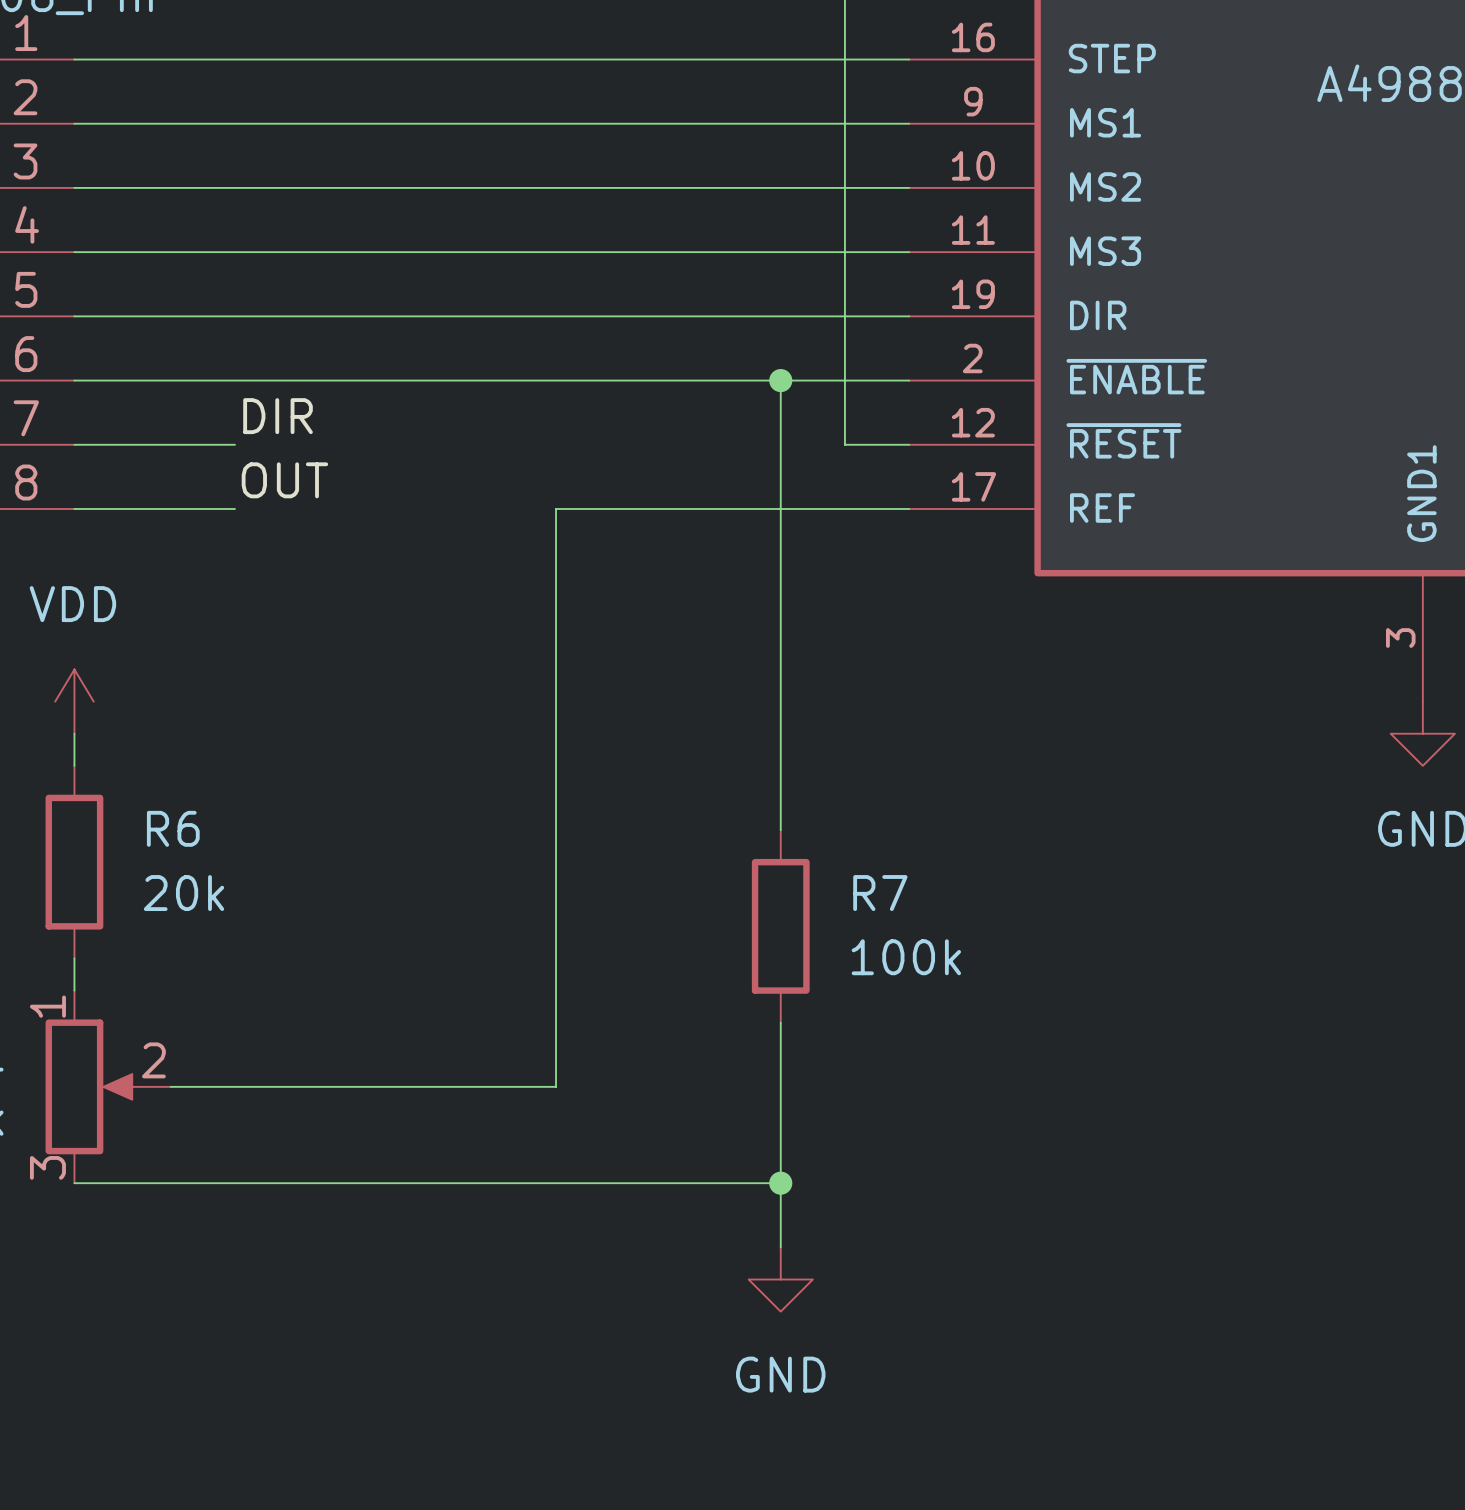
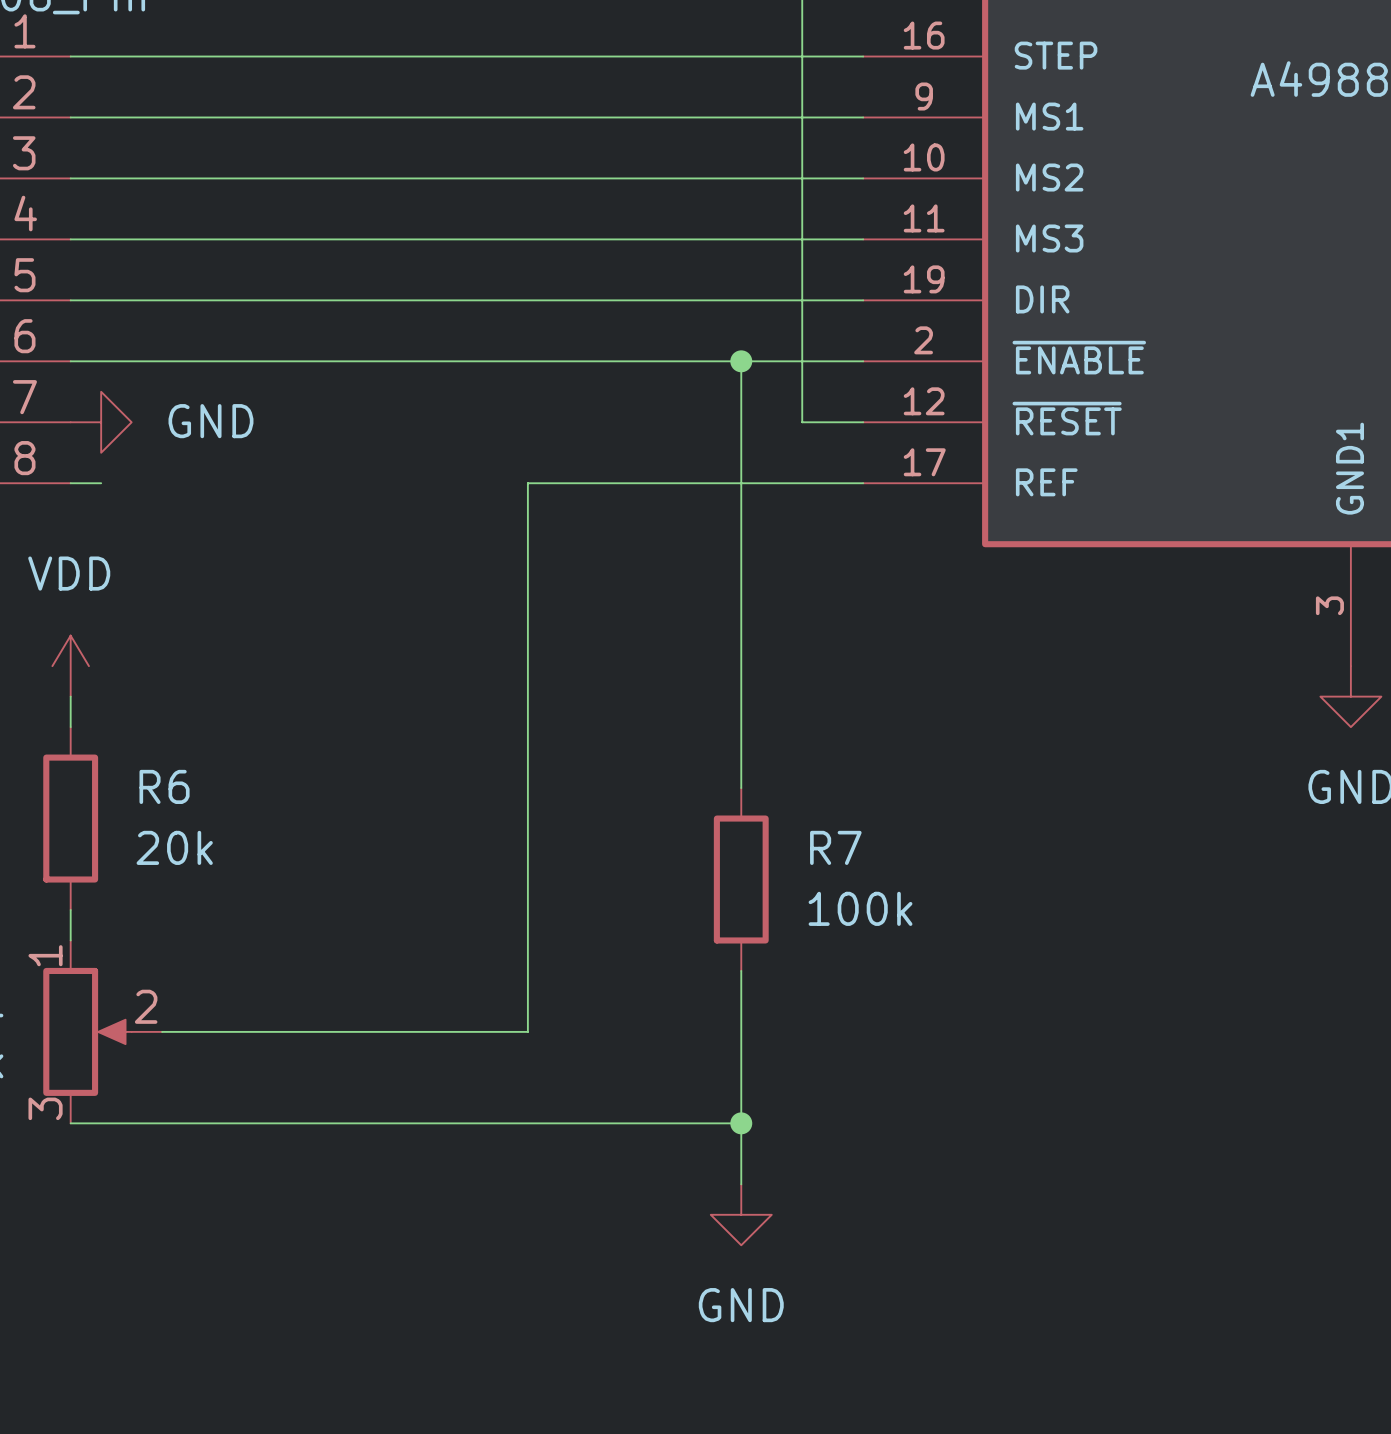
label: DIR (278, 416) -> none
wire: (74, 444) (234, 444) -> none
power symbol: none -> GND (101, 422)
label: OUT (284, 480) -> none
wire: (106, 508) (234, 508) -> none

